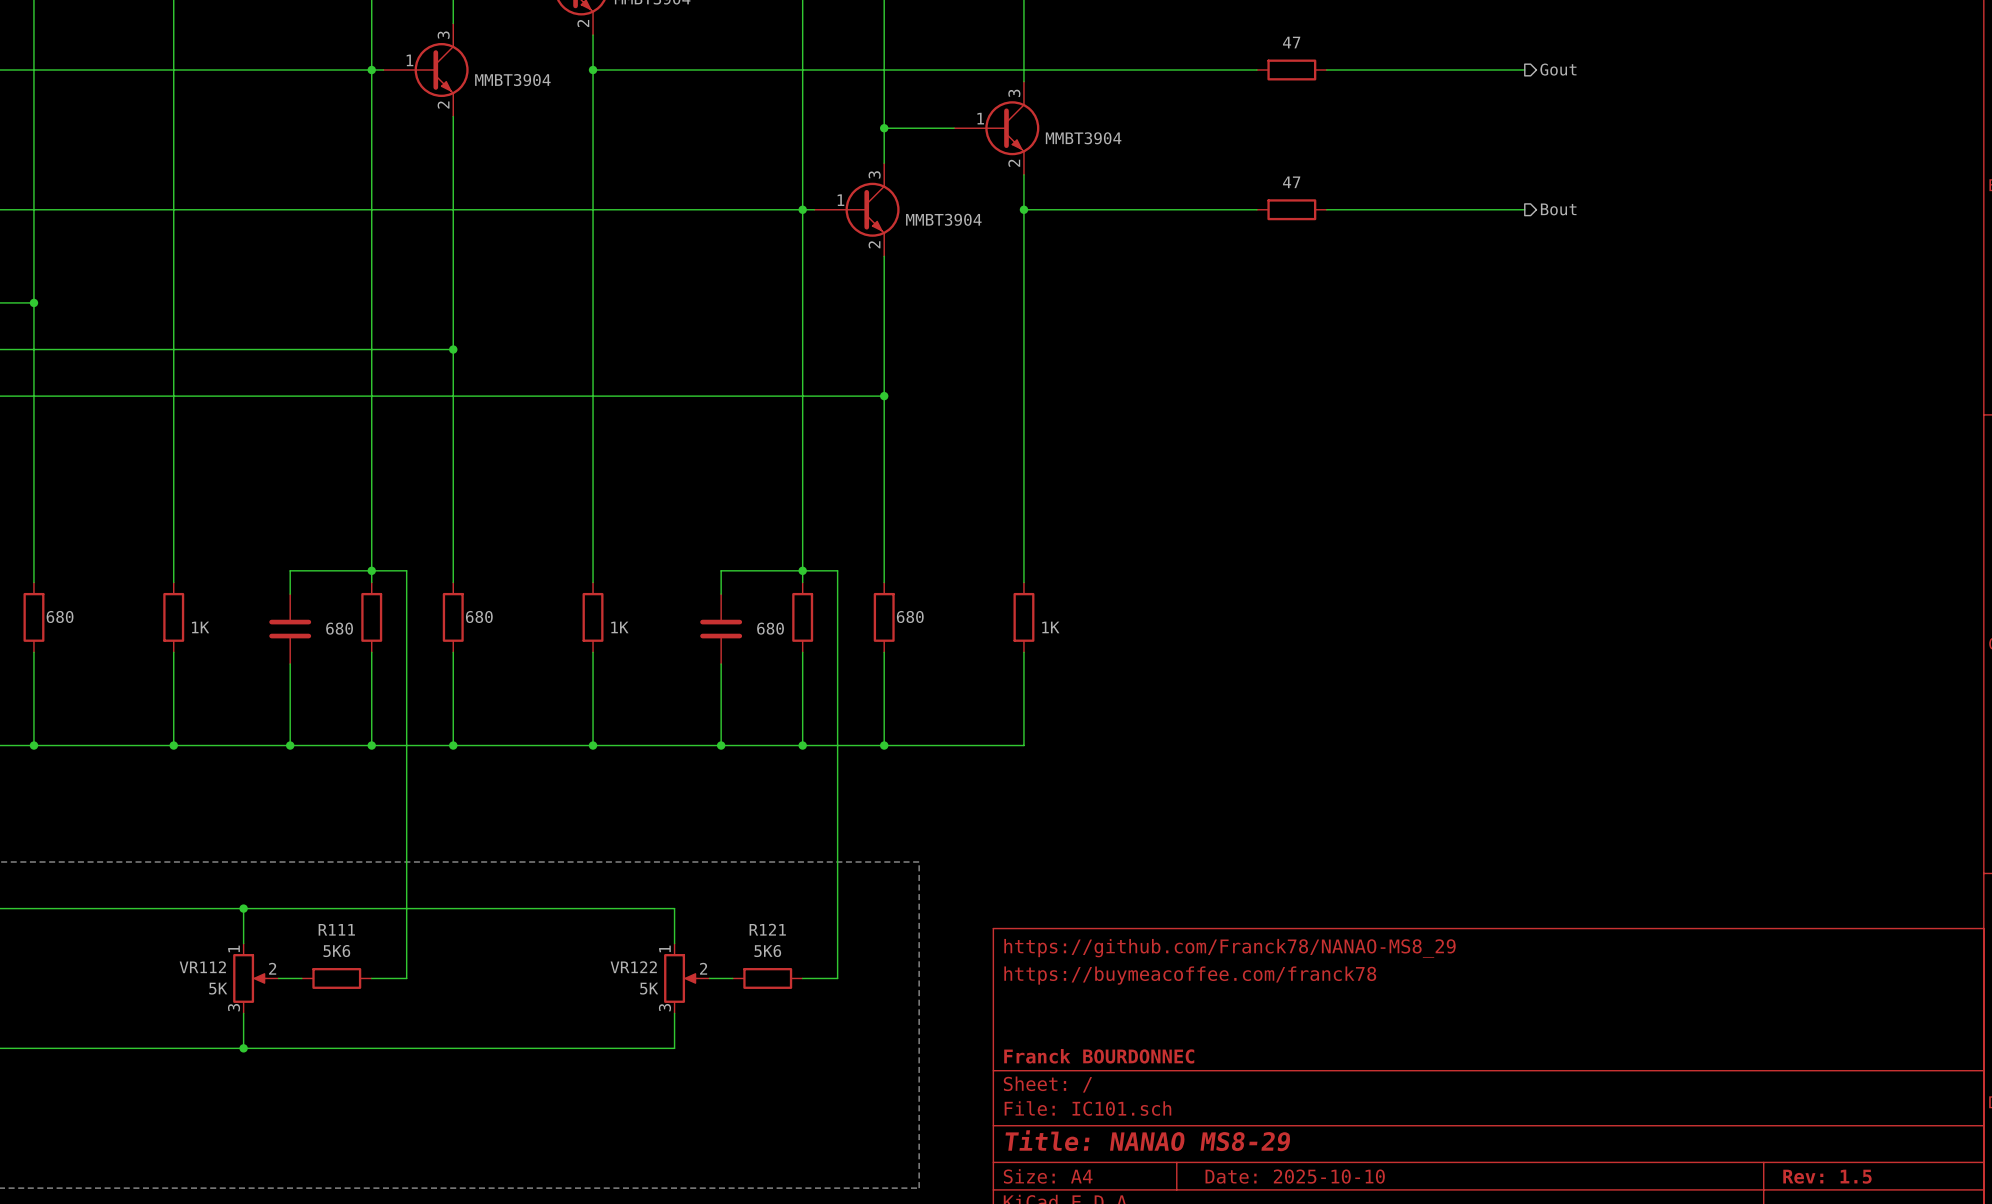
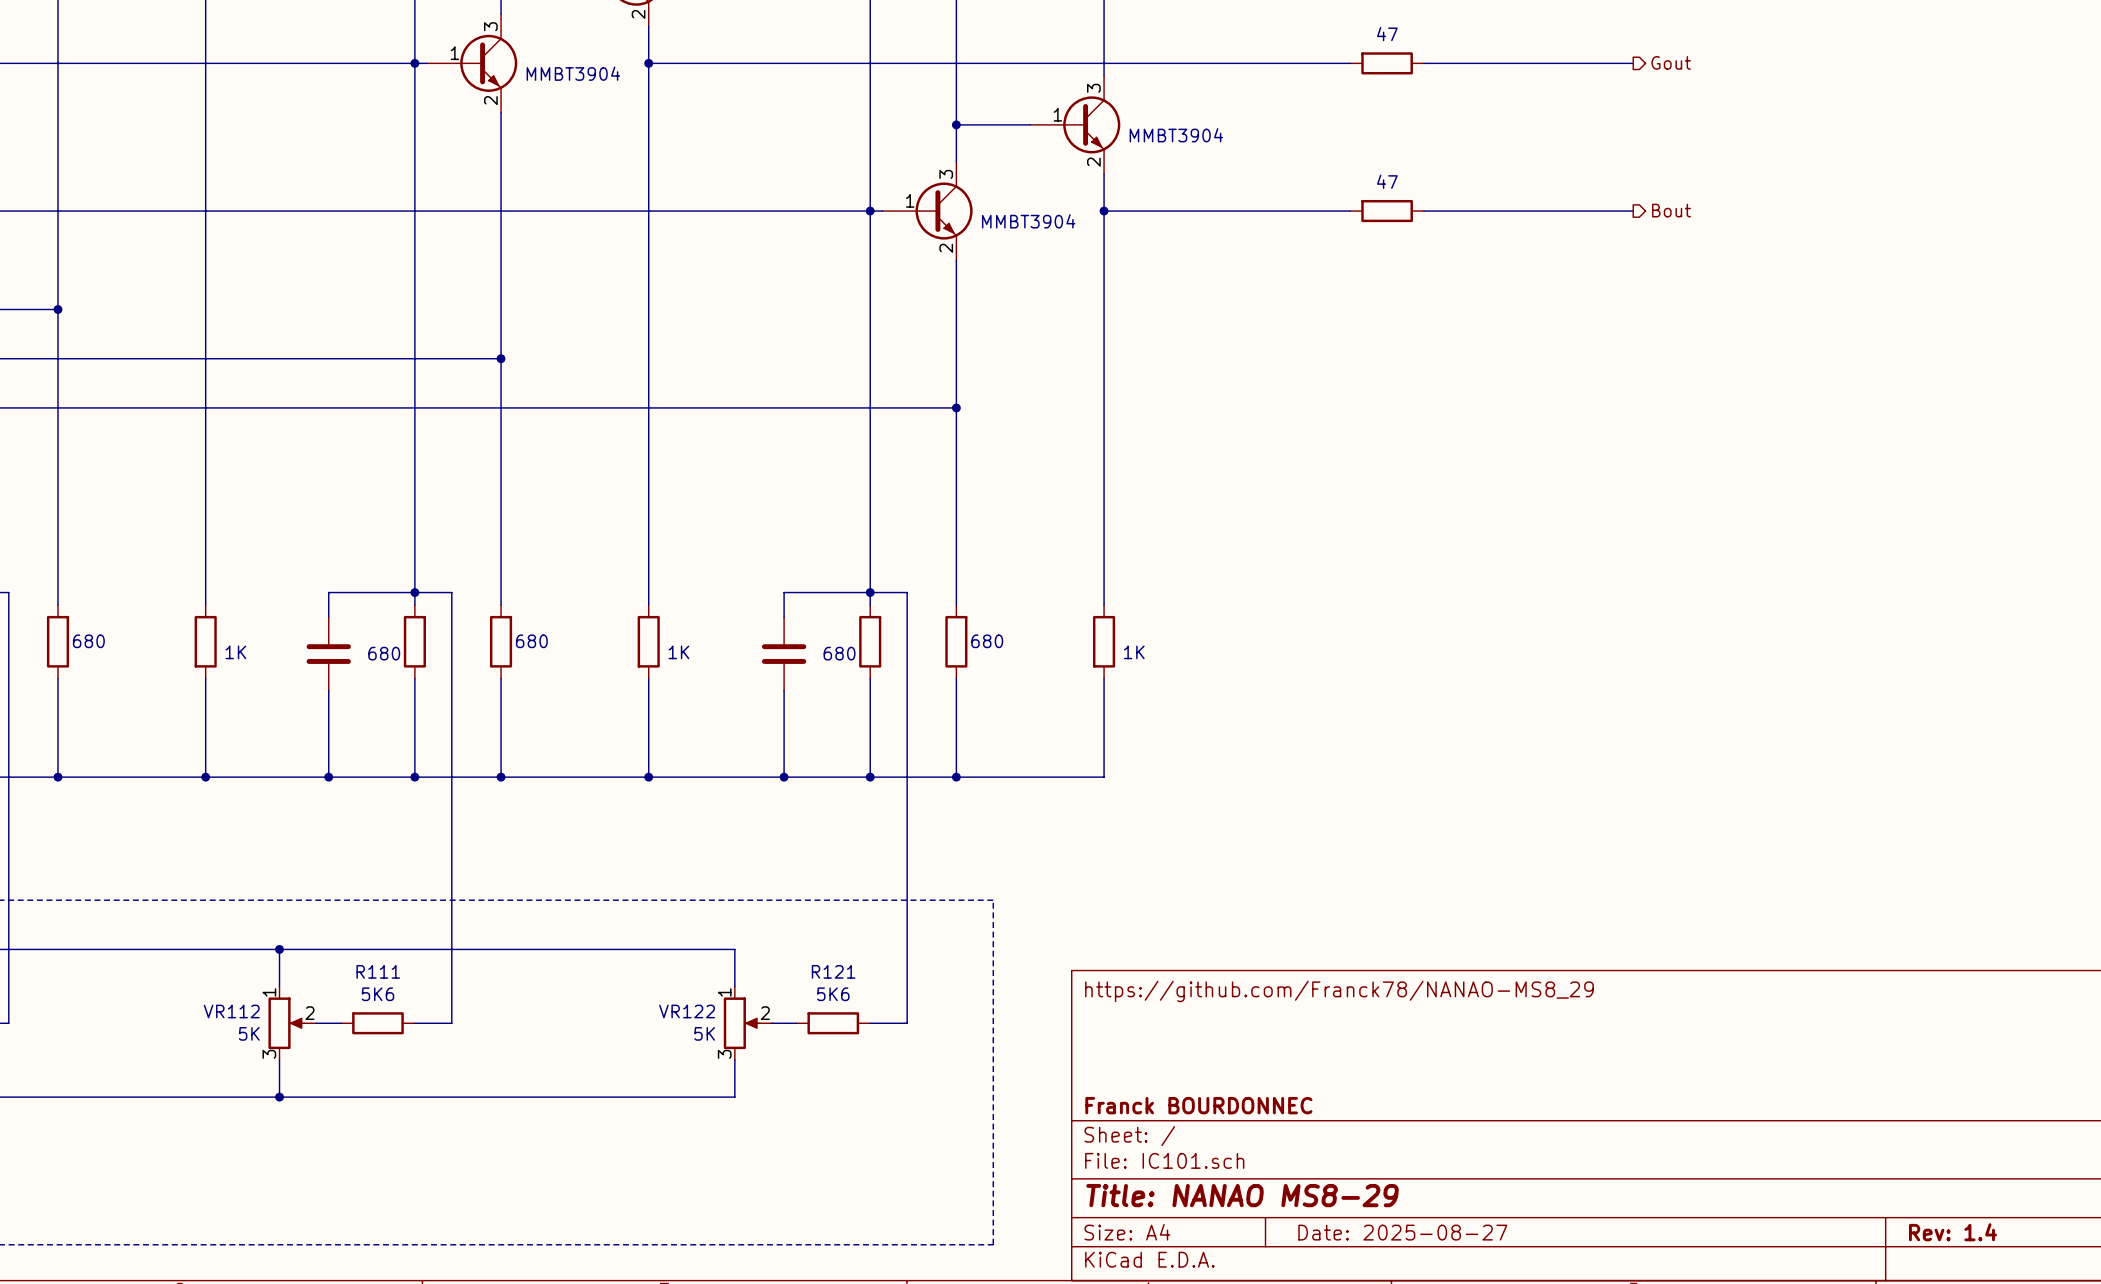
title block: https://buymeacoffee.com/franck78 (1190, 975) -> none
title block: Date: 2025-10-10 (1295, 1176) -> Date: 2025-08-27 (1402, 1232)
title block: Rev: 1.5 (1827, 1176) -> Rev: 1.4 (1953, 1232)

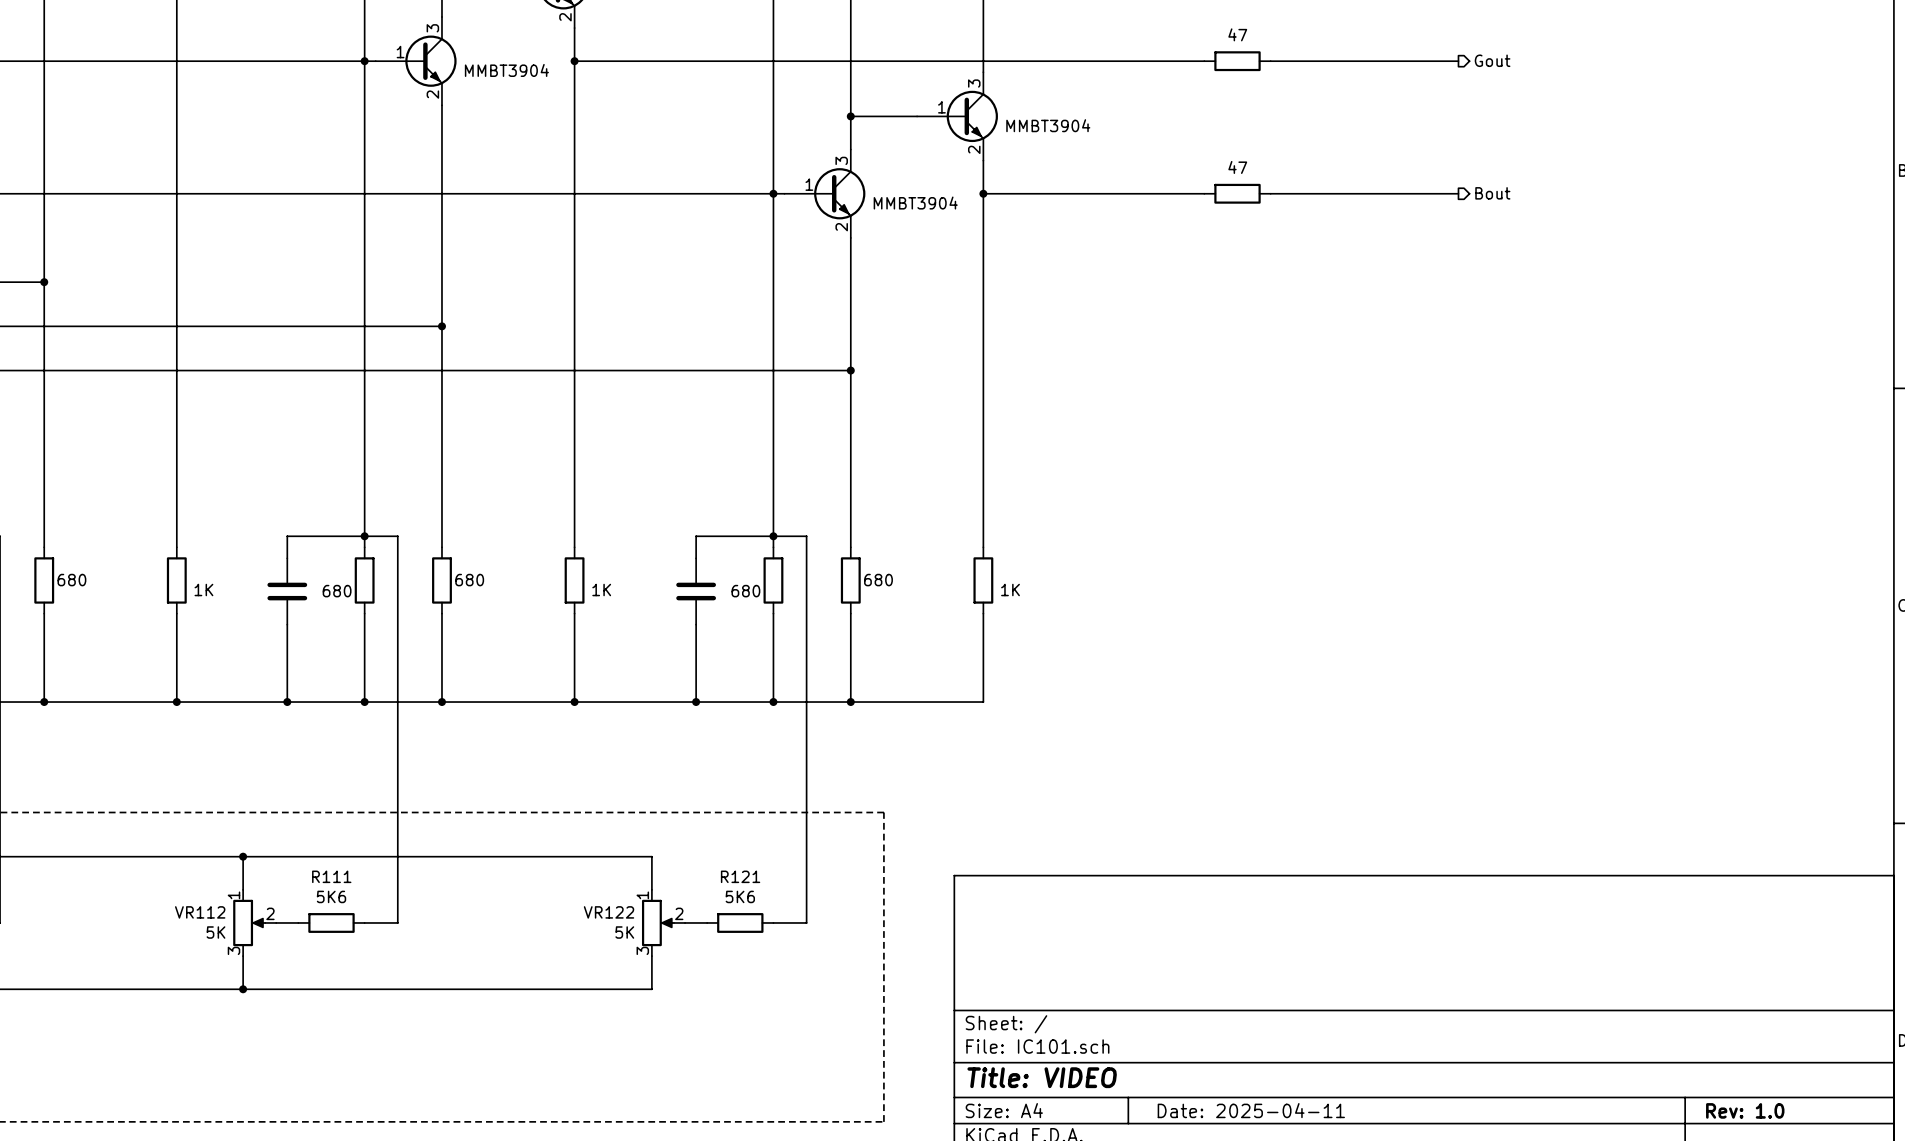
title block: https://github.com/Franck78/NANAO-MS8_29 (1339, 991) -> none
title block: Franck BOURDONNEC (1198, 1105) -> none
title block: Title: NANAO MS8-29 (1242, 1195) -> Title: VIDEO (1042, 1077)
title block: Date: 2025-08-27 (1402, 1232) -> Date: 2025-04-11 (1251, 1110)
title block: Rev: 1.4 (1953, 1232) -> Rev: 1.0 (1745, 1110)

